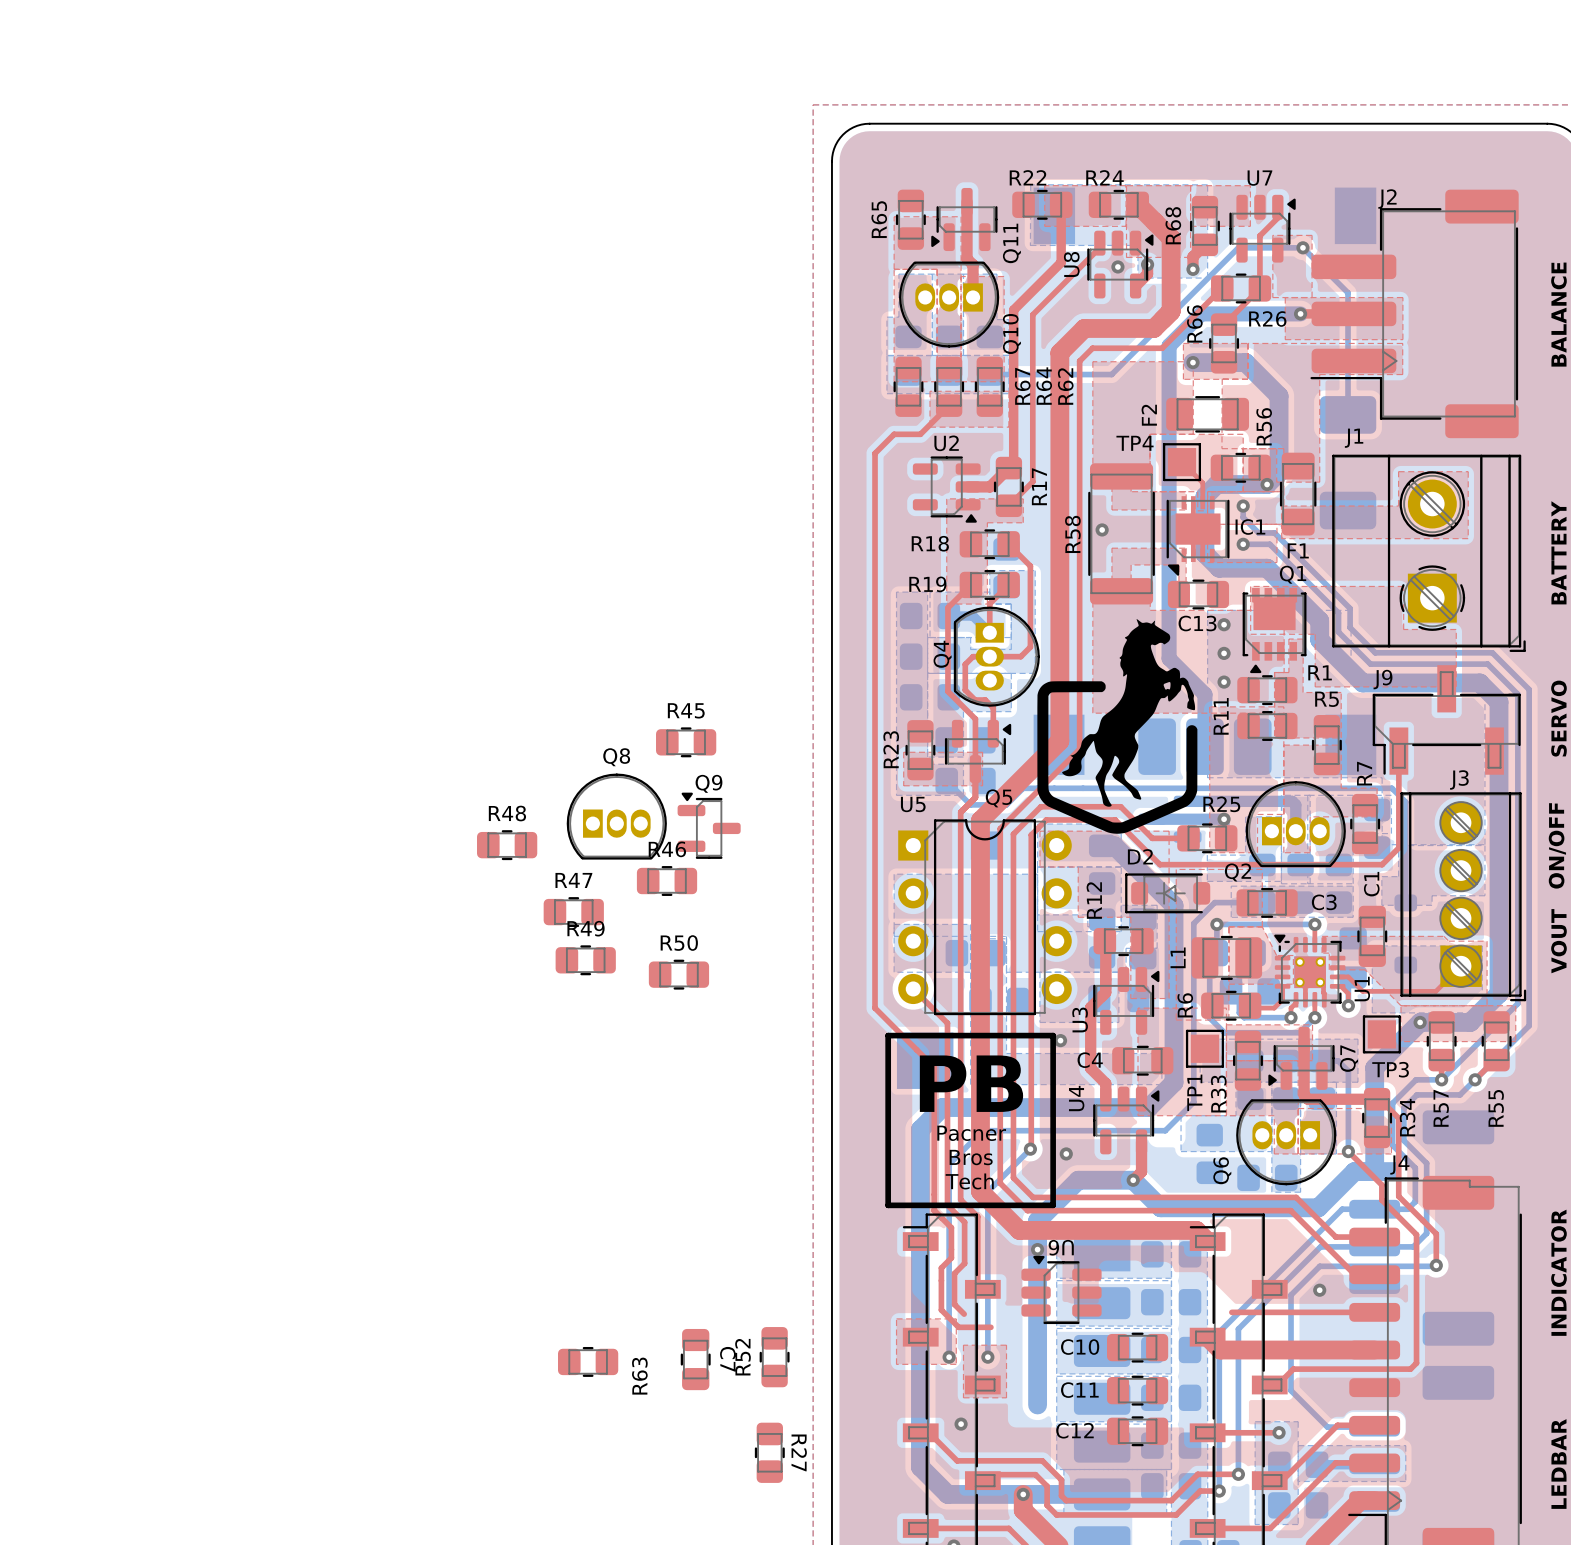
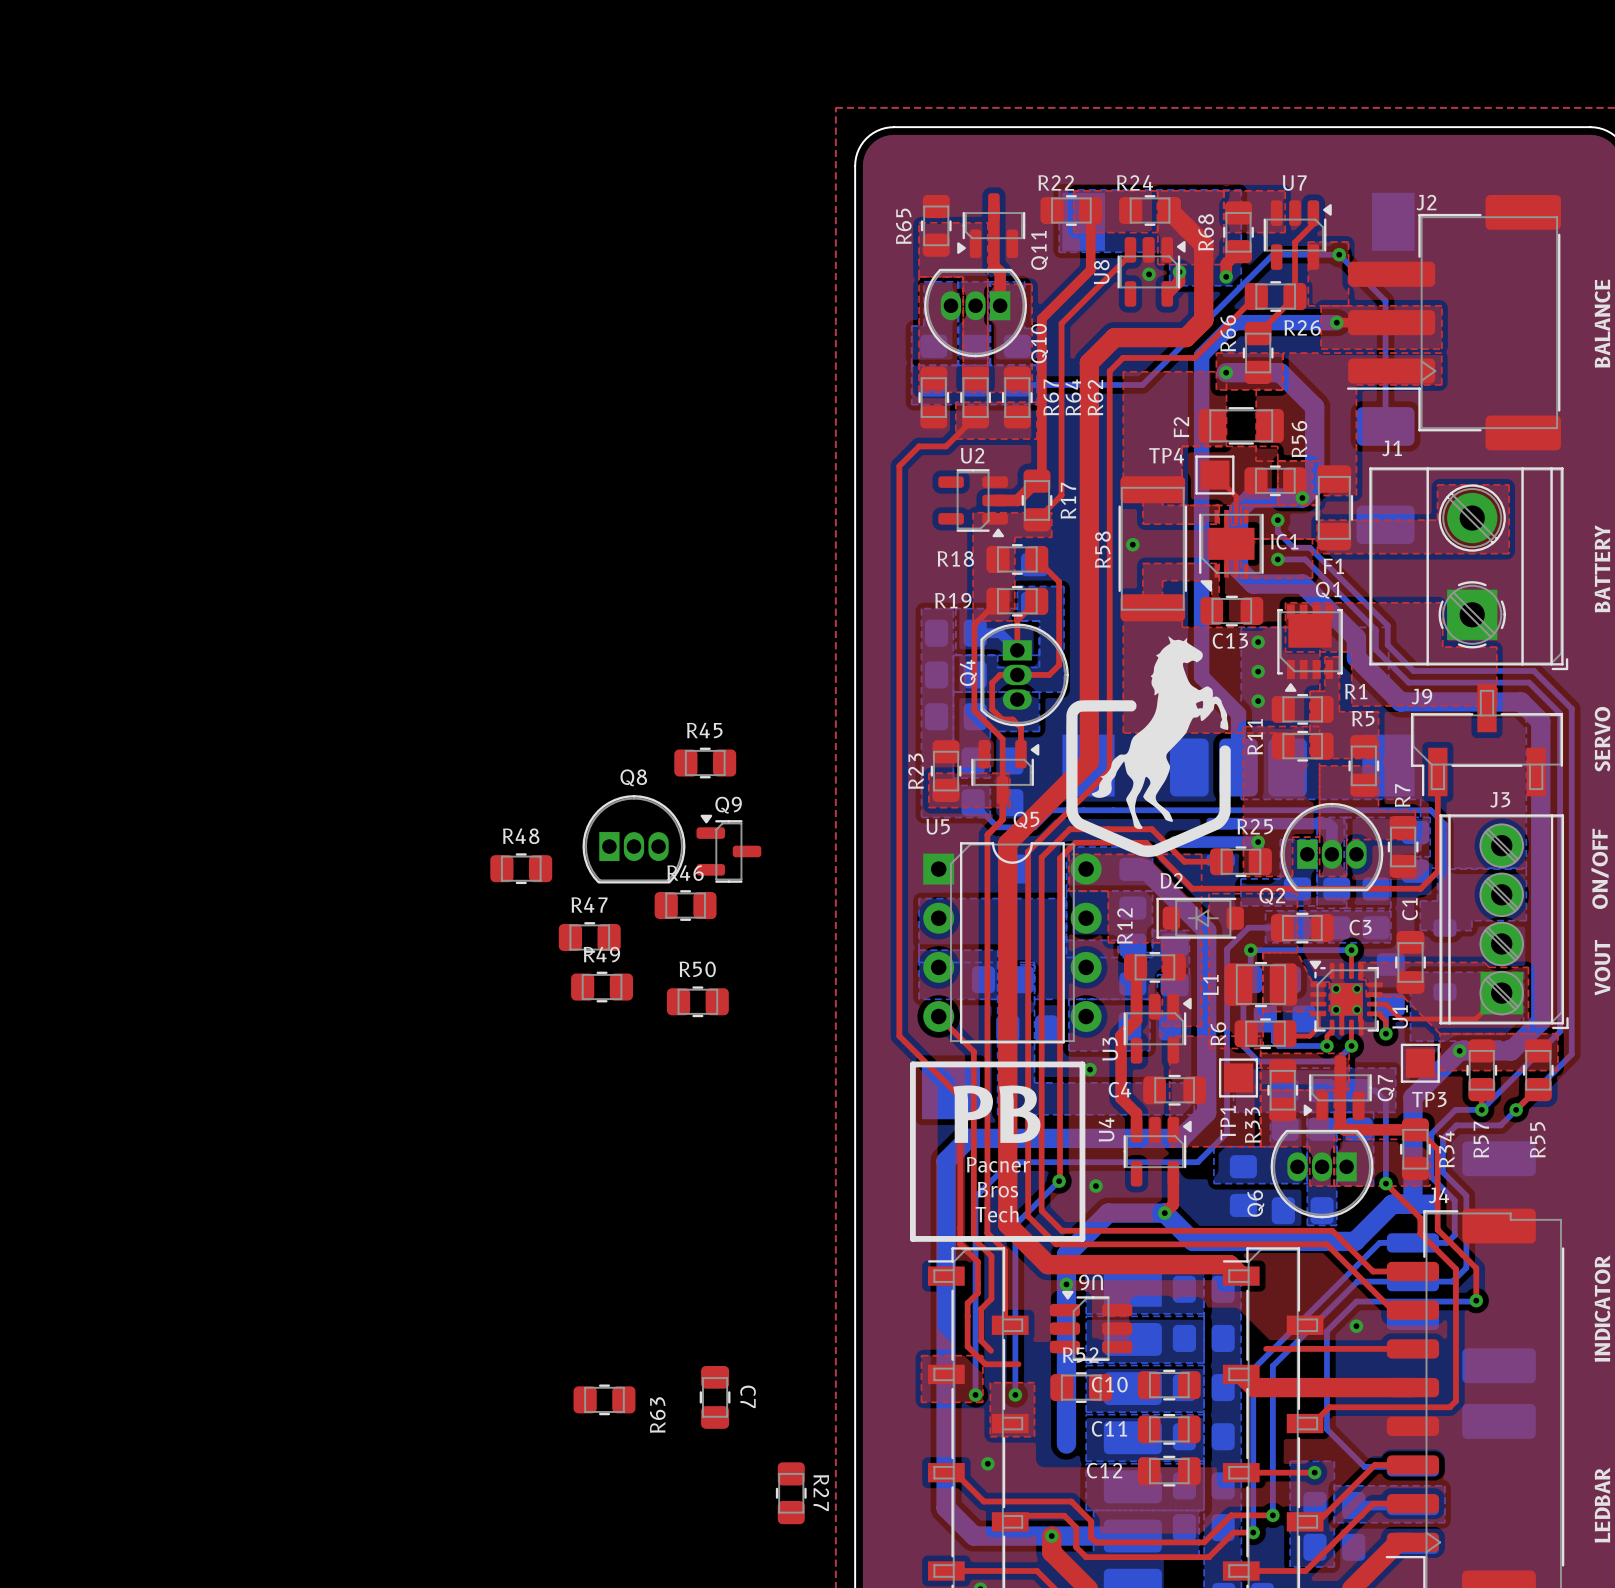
R52 rotation: 0° (774, 1357) -> 90° clockwise (1081, 1387)
R52 position: (774, 1357) -> (1081, 1387)

